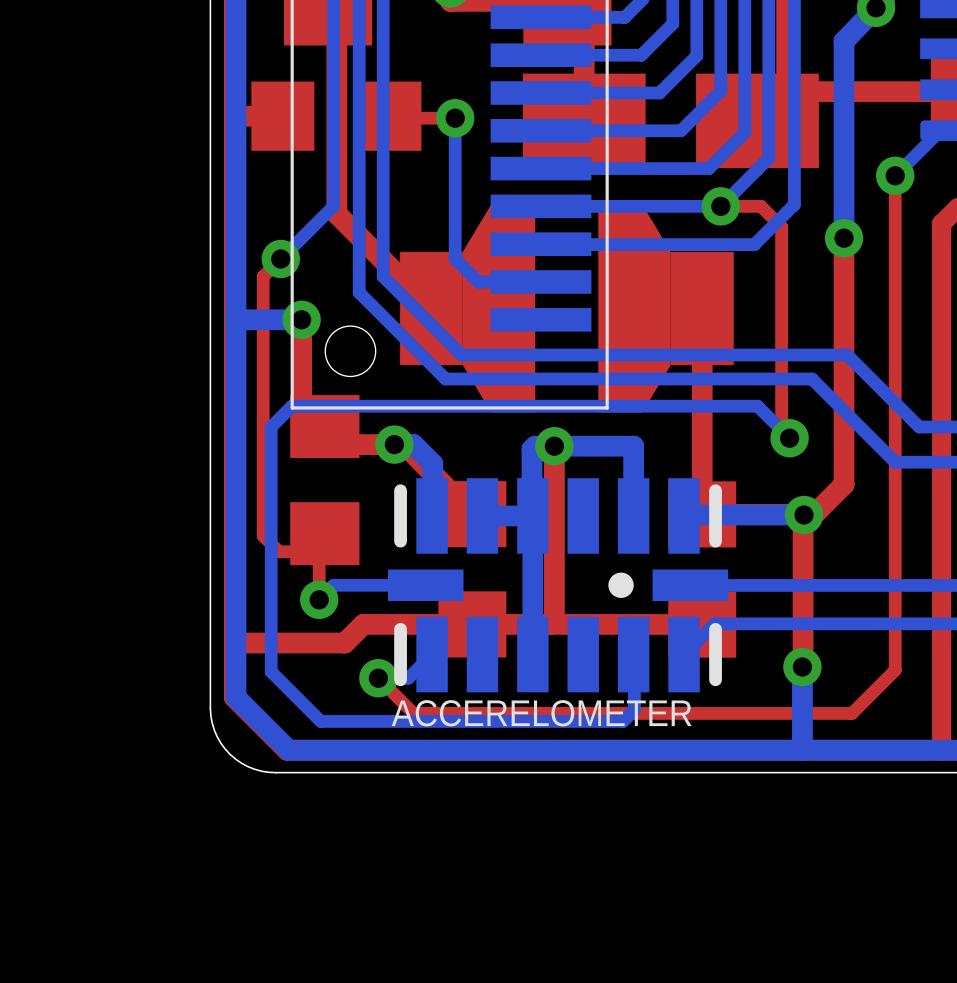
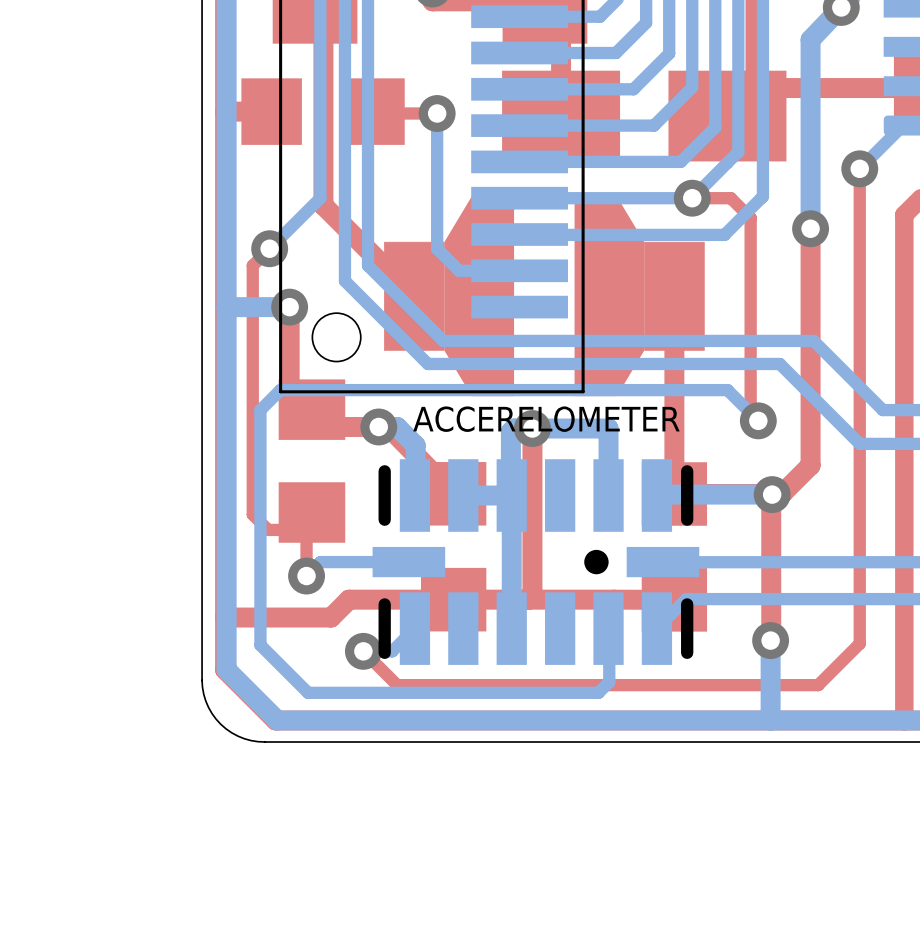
ACCERELOMETER name position: ACCERELOMETER (541, 713) -> ACCERELOMETER (546, 419)

